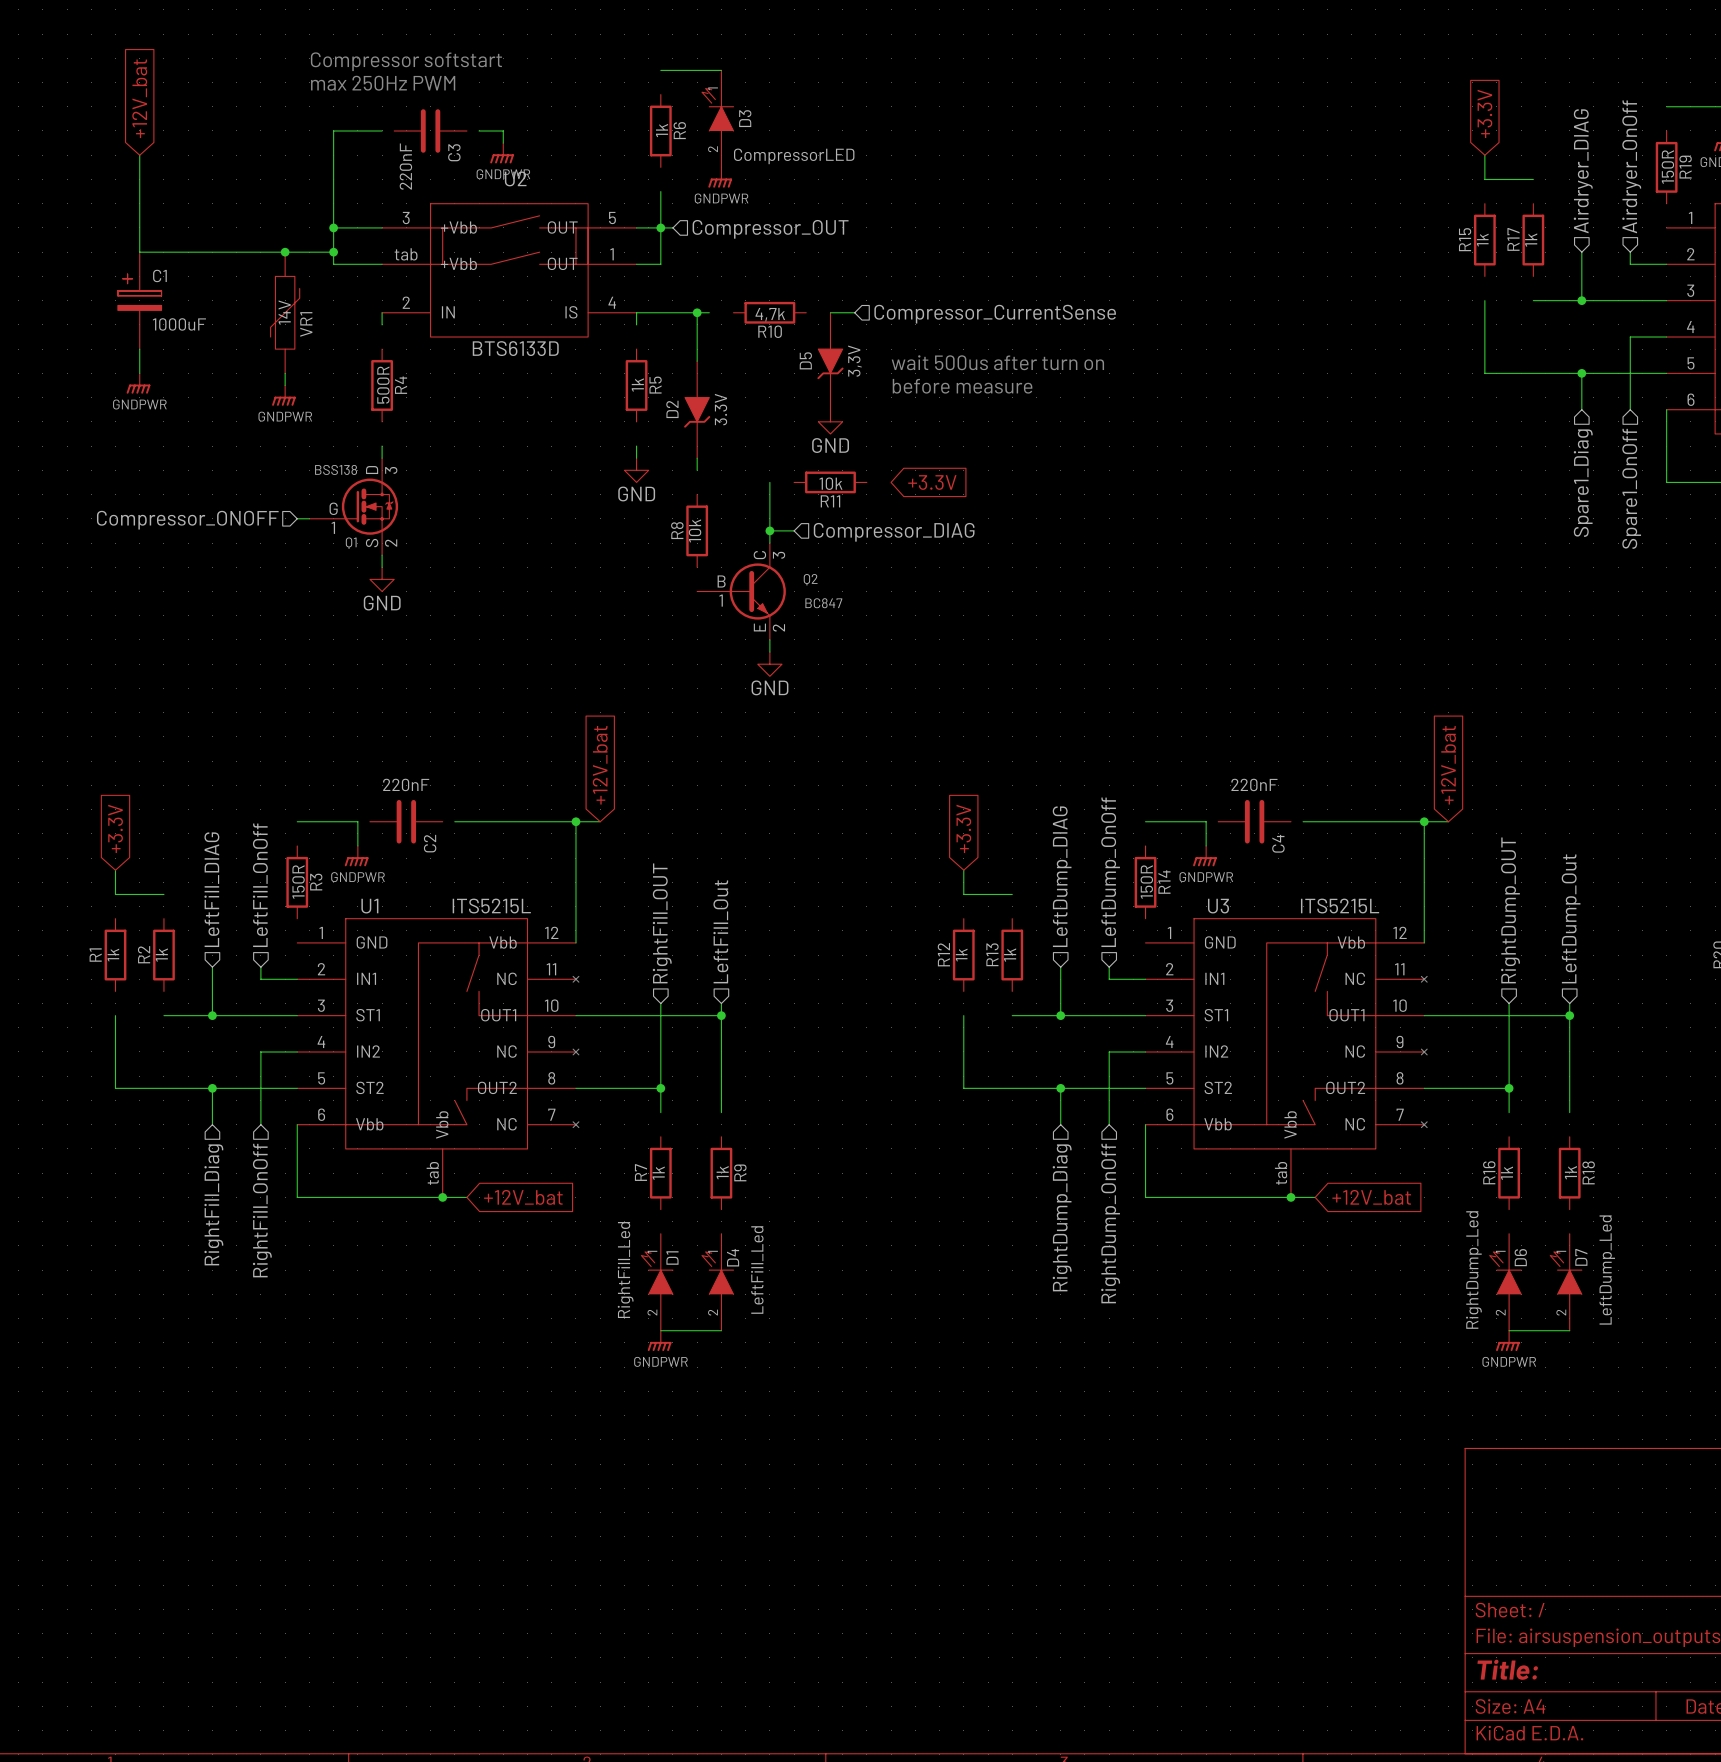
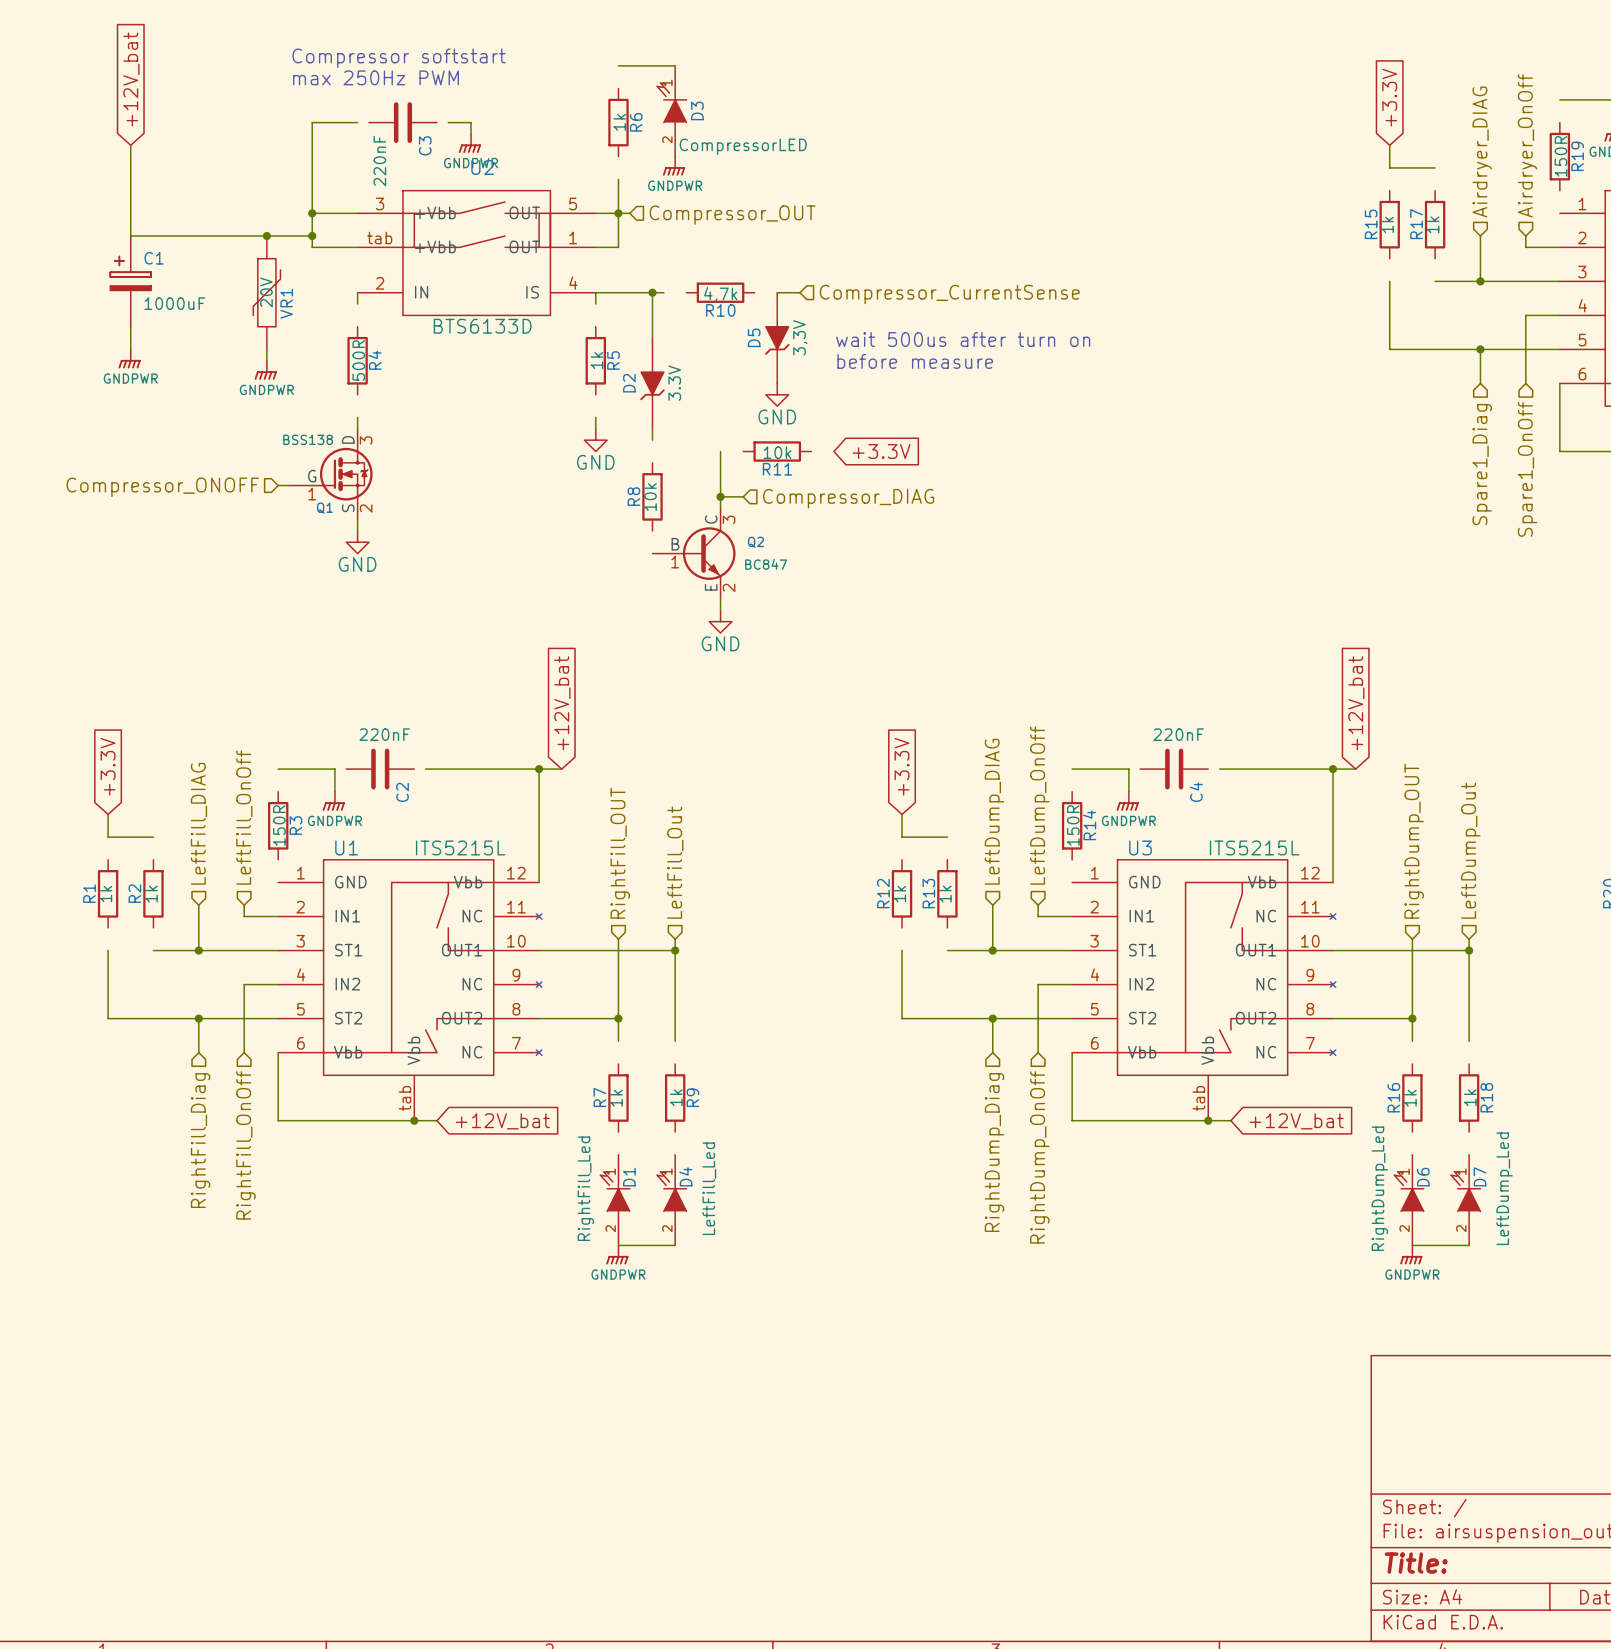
VR1 value: 14V (284, 312) -> 20V (266, 292)

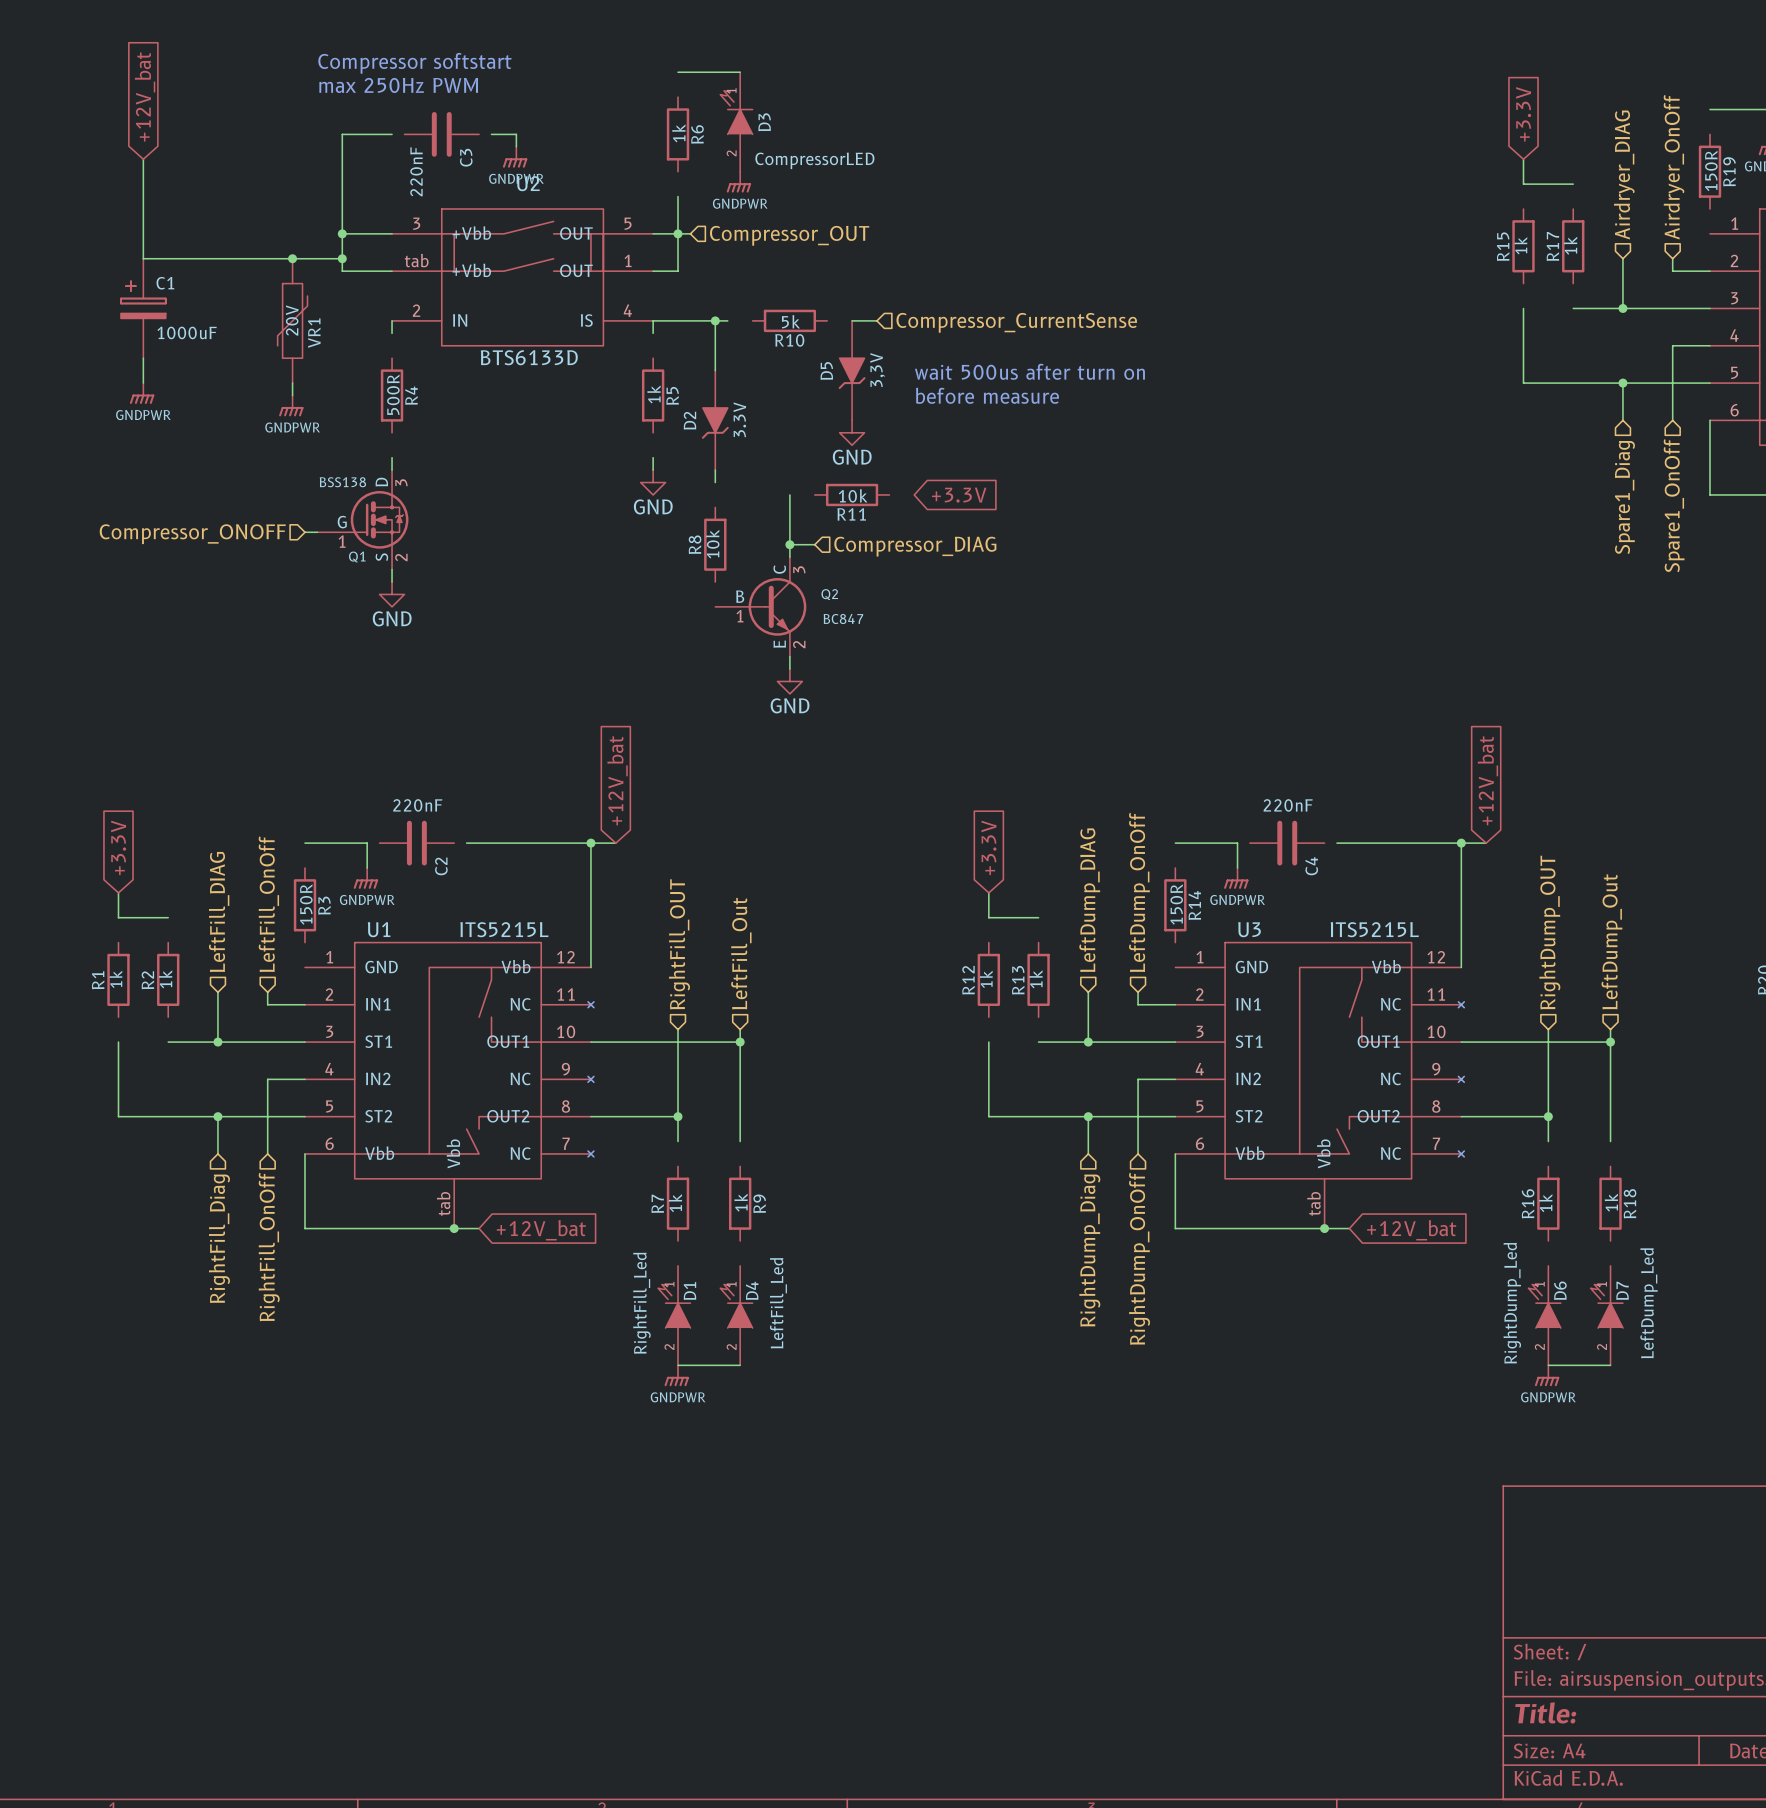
R10 value: 4,7k (720, 294) -> 5k (790, 321)

